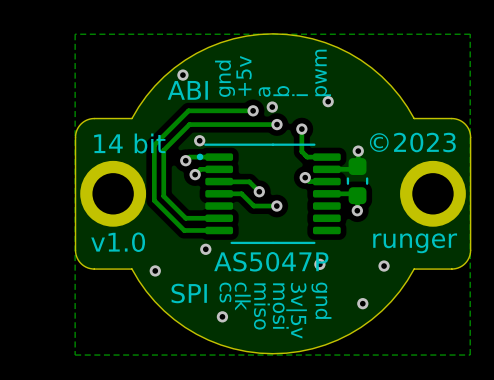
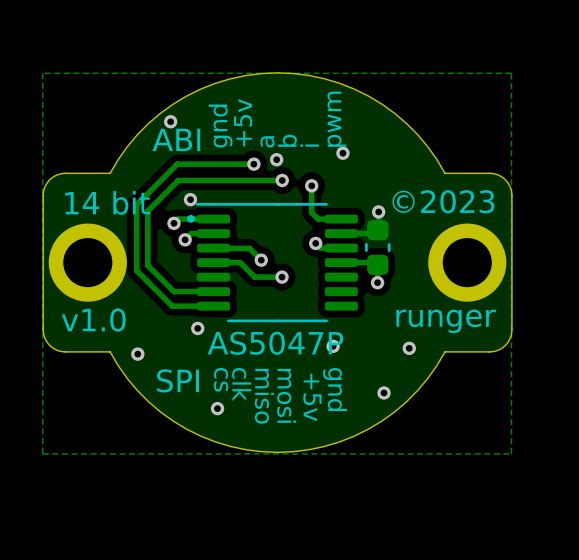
text: 3v|5v (296, 310) -> +5v (312, 397)

